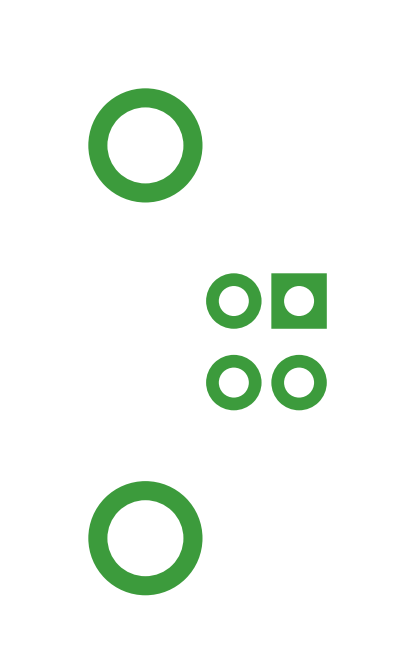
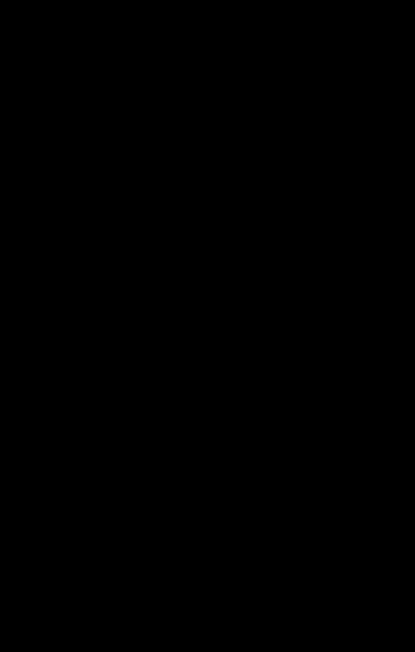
part: (207, 341) -> none

